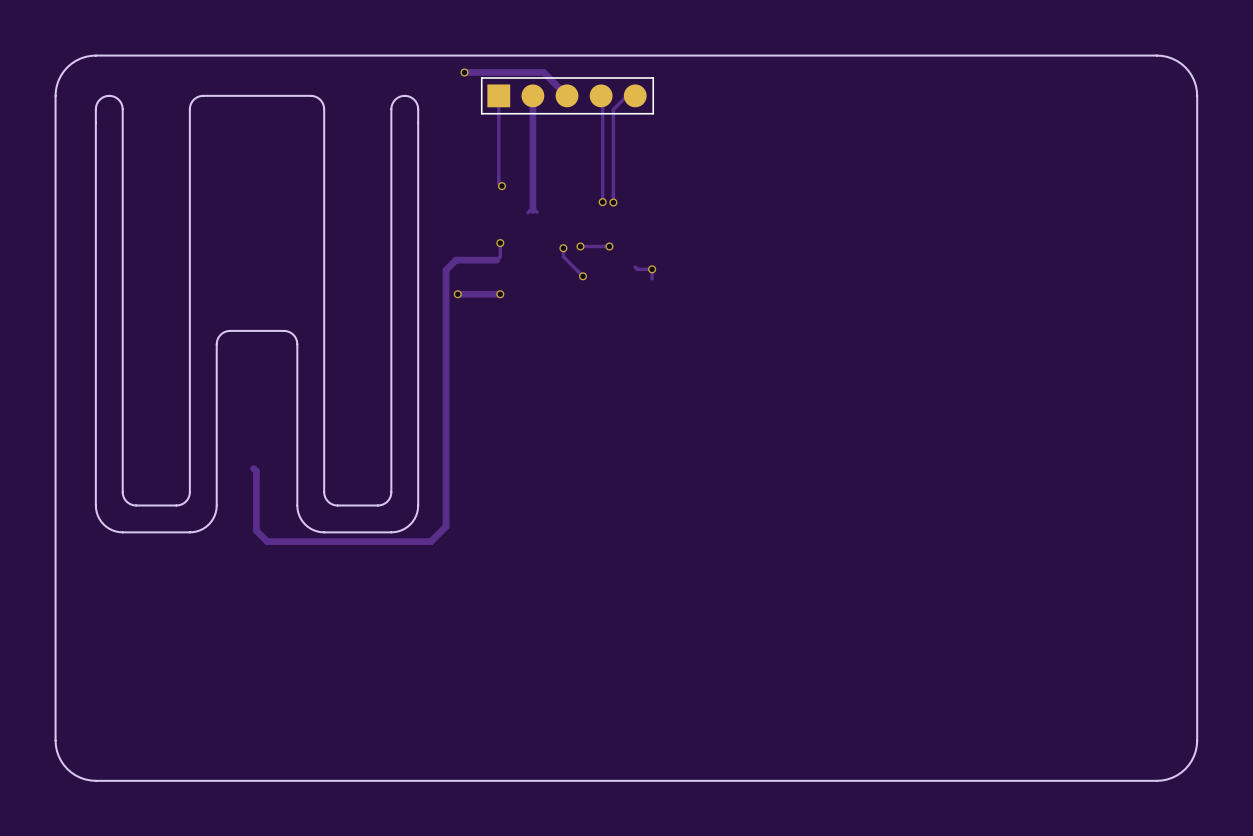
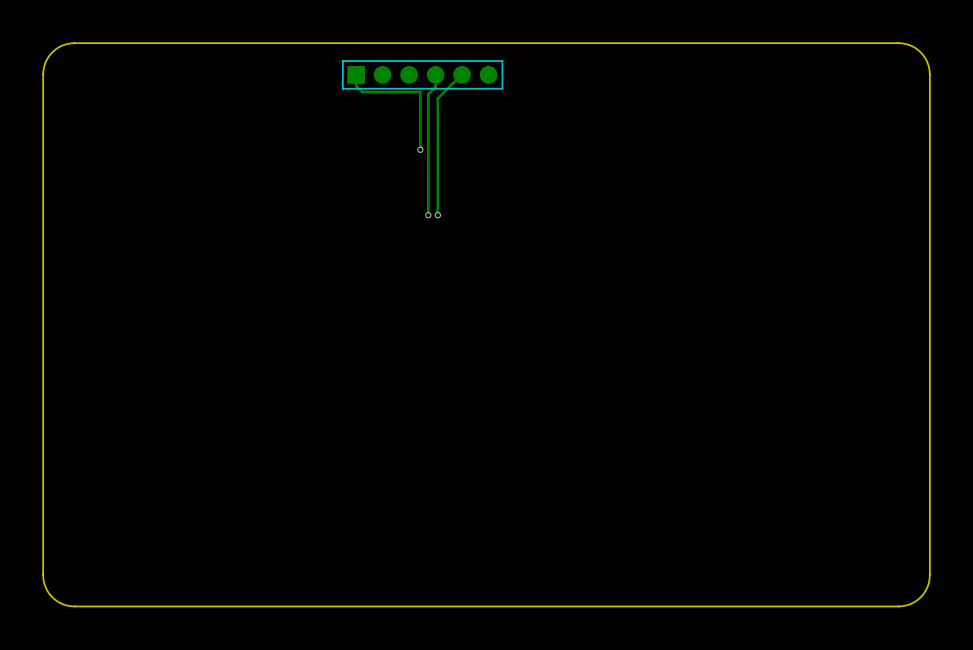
track: (464, 72) (543, 72) (567, 95) -> none
via: (464, 72) -> none
board edge: (404, 95) (395, 99) (391, 107) (391, 492) (387, 501) (377, 505) (334, 505) (328, 501) (324, 493) (324, 109) (320, 99) (310, 95) (201, 95) (195, 98) (190, 104) (189, 493) (185, 501) (178, 505) (134, 505) (125, 500) (122, 492) (122, 107) (119, 101) (112, 96) (104, 96) (98, 101) (95, 109) (95, 505) (97, 515) (106, 526) (122, 532) (193, 532) (203, 528) (213, 518) (216, 505) (216, 342) (220, 334) (230, 330) (285, 331) (292, 333) (296, 339) (297, 505) (299, 515) (305, 524) (320, 532) (391, 532) (404, 528) (412, 521) (418, 505) (418, 109) (414, 99) (404, 95) -> none
track: none -> (356, 74) (356, 85) (362, 92) (420, 92) (420, 149)
track: (498, 95) (498, 182) (502, 186) -> none
track: (532, 95) (532, 210) (527, 212) -> none
track: none -> (435, 74) (435, 86) (428, 94) (428, 215)
part: (567, 95) -> none
track: none -> (462, 74) (437, 98) (437, 215) (437, 210)
track: (601, 95) (602, 202) -> none
track: (635, 95) (627, 95) (613, 109) (613, 202) -> none
part: none -> (422, 74)
via: (502, 186) -> none
via: none -> (420, 149)
via: (602, 202) -> none
via: (613, 202) -> none
track: (534, 209) (536, 212) -> none
track: (500, 243) (500, 256) (496, 260) (455, 260) (446, 270) (446, 526) (431, 541) (267, 541) (256, 530) (256, 471) (252, 469) -> none
via: (500, 243) -> none
via: (580, 246) -> none
track: (609, 246) (580, 246) -> none
via: (609, 246) -> none
track: (563, 248) (563, 256) (583, 276) -> none
via: (563, 248) -> none
track: (635, 266) (637, 269) (652, 269) -> none
via: (652, 269) -> none
track: (652, 272) (652, 278) -> none
via: (583, 276) -> none
via: none -> (428, 215)
via: none -> (437, 215)
via: (457, 294) -> none
track: (500, 294) (457, 294) -> none
via: (500, 294) -> none

